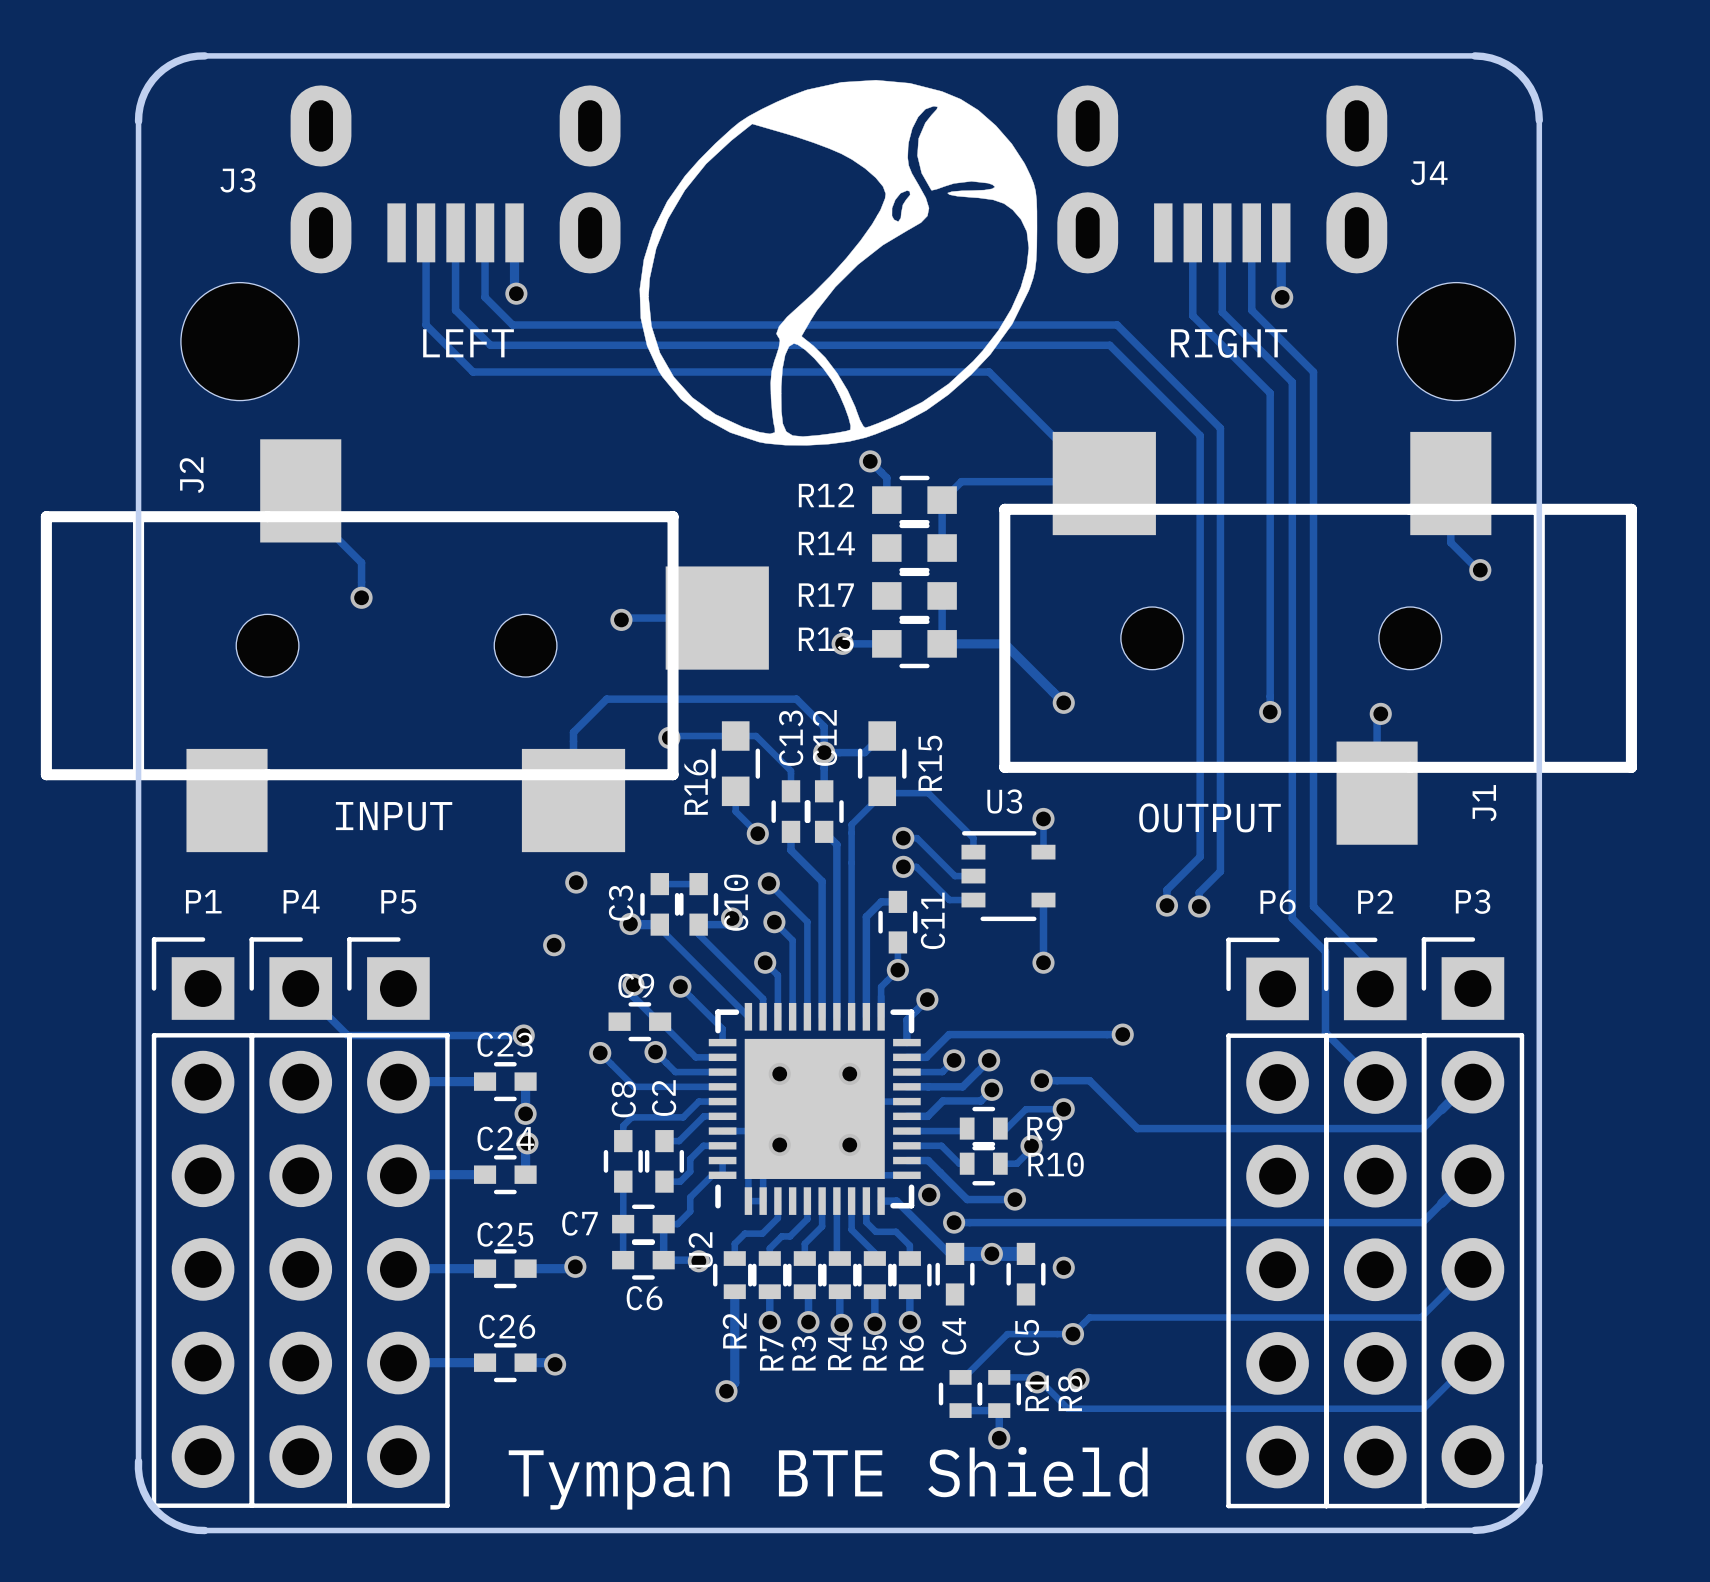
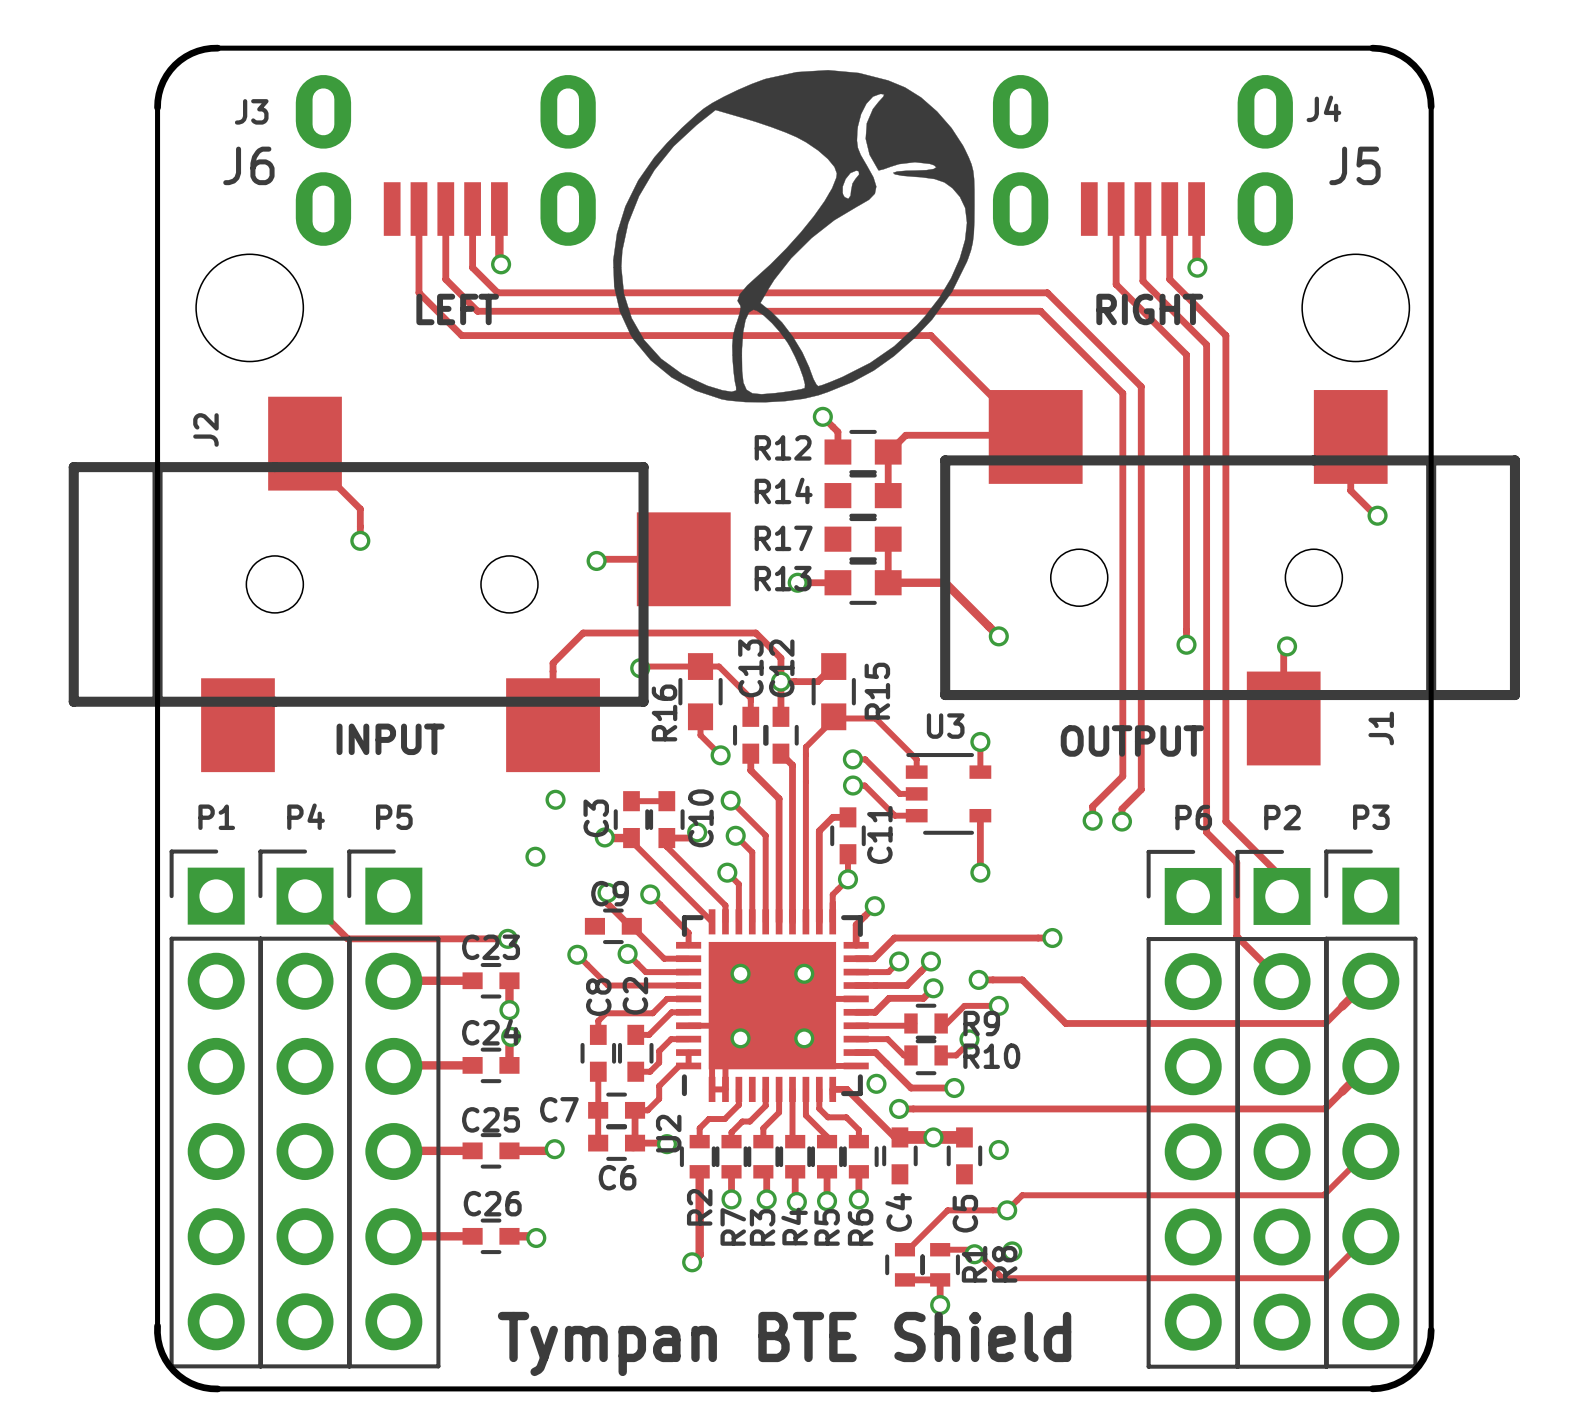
J4 name position: J4 (1429, 173) -> J4 (1323, 108)
J3 name position: J3 (237, 180) -> J3 (251, 111)
J6 name: none -> J6 (248, 165)
J5 name: none -> J5 (1354, 165)

